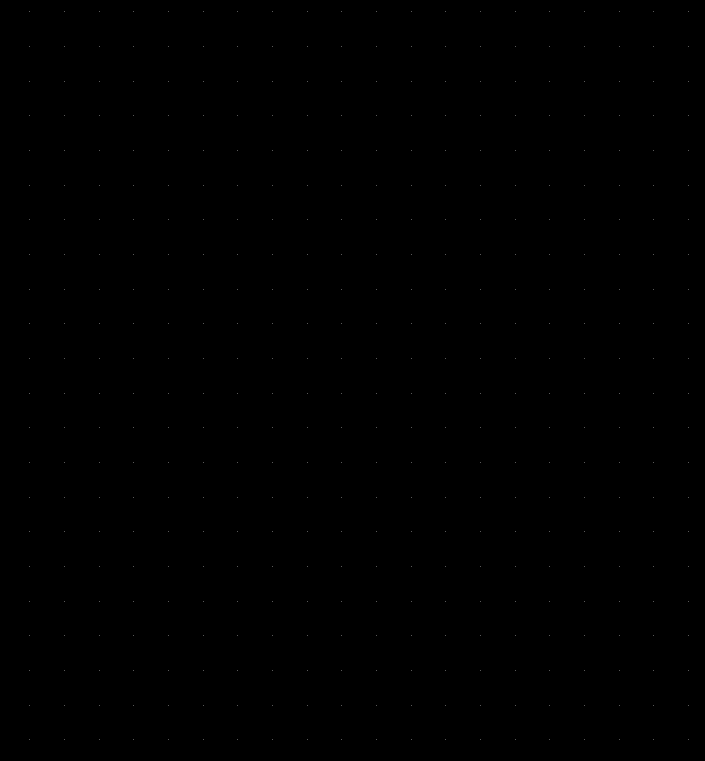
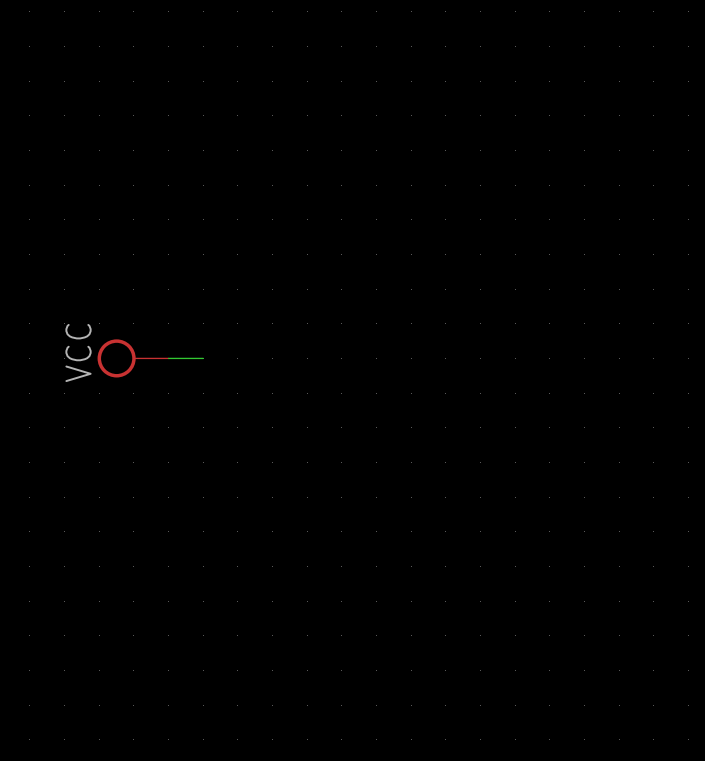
power symbol: none -> VCC (133, 358)
wire: none -> (168, 358) (203, 358)

